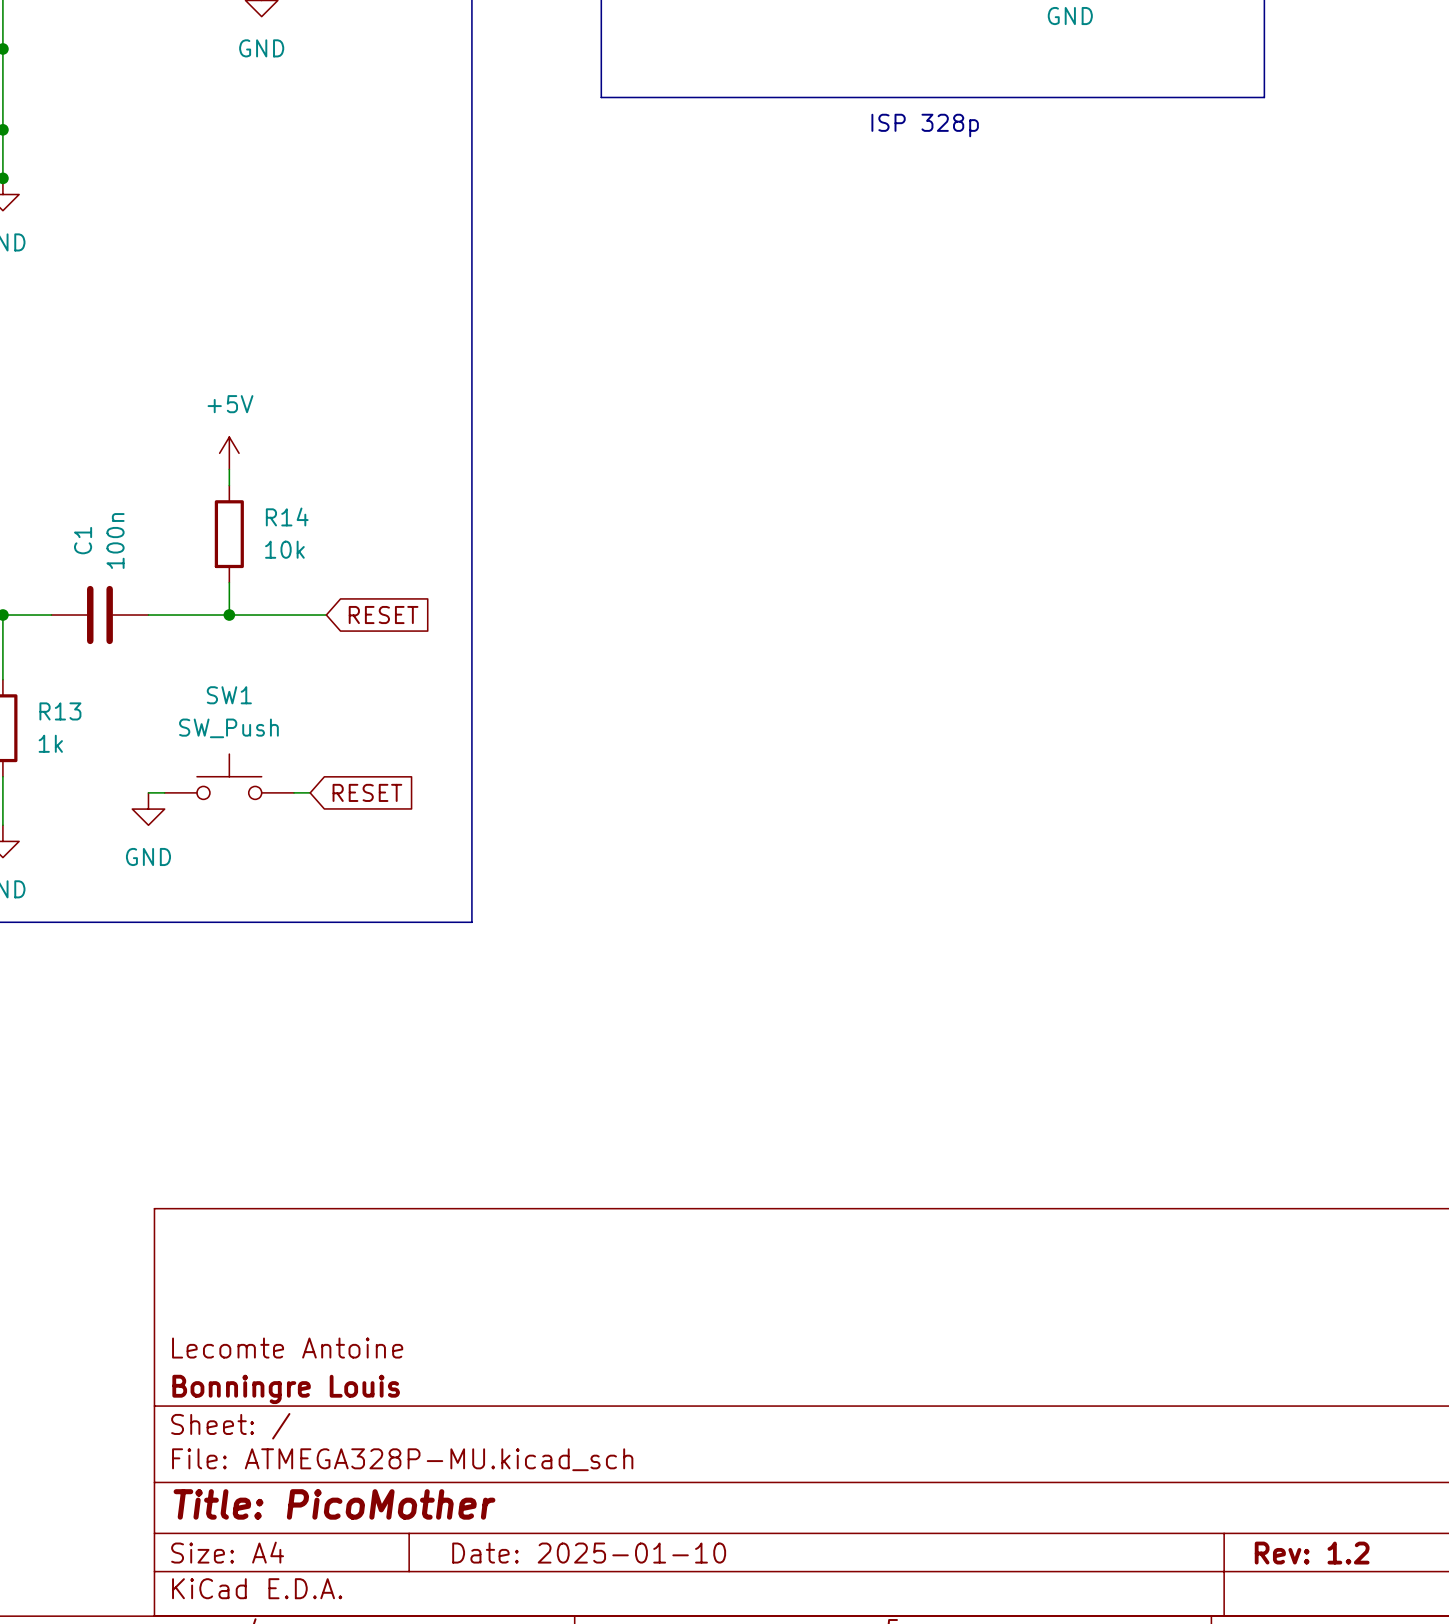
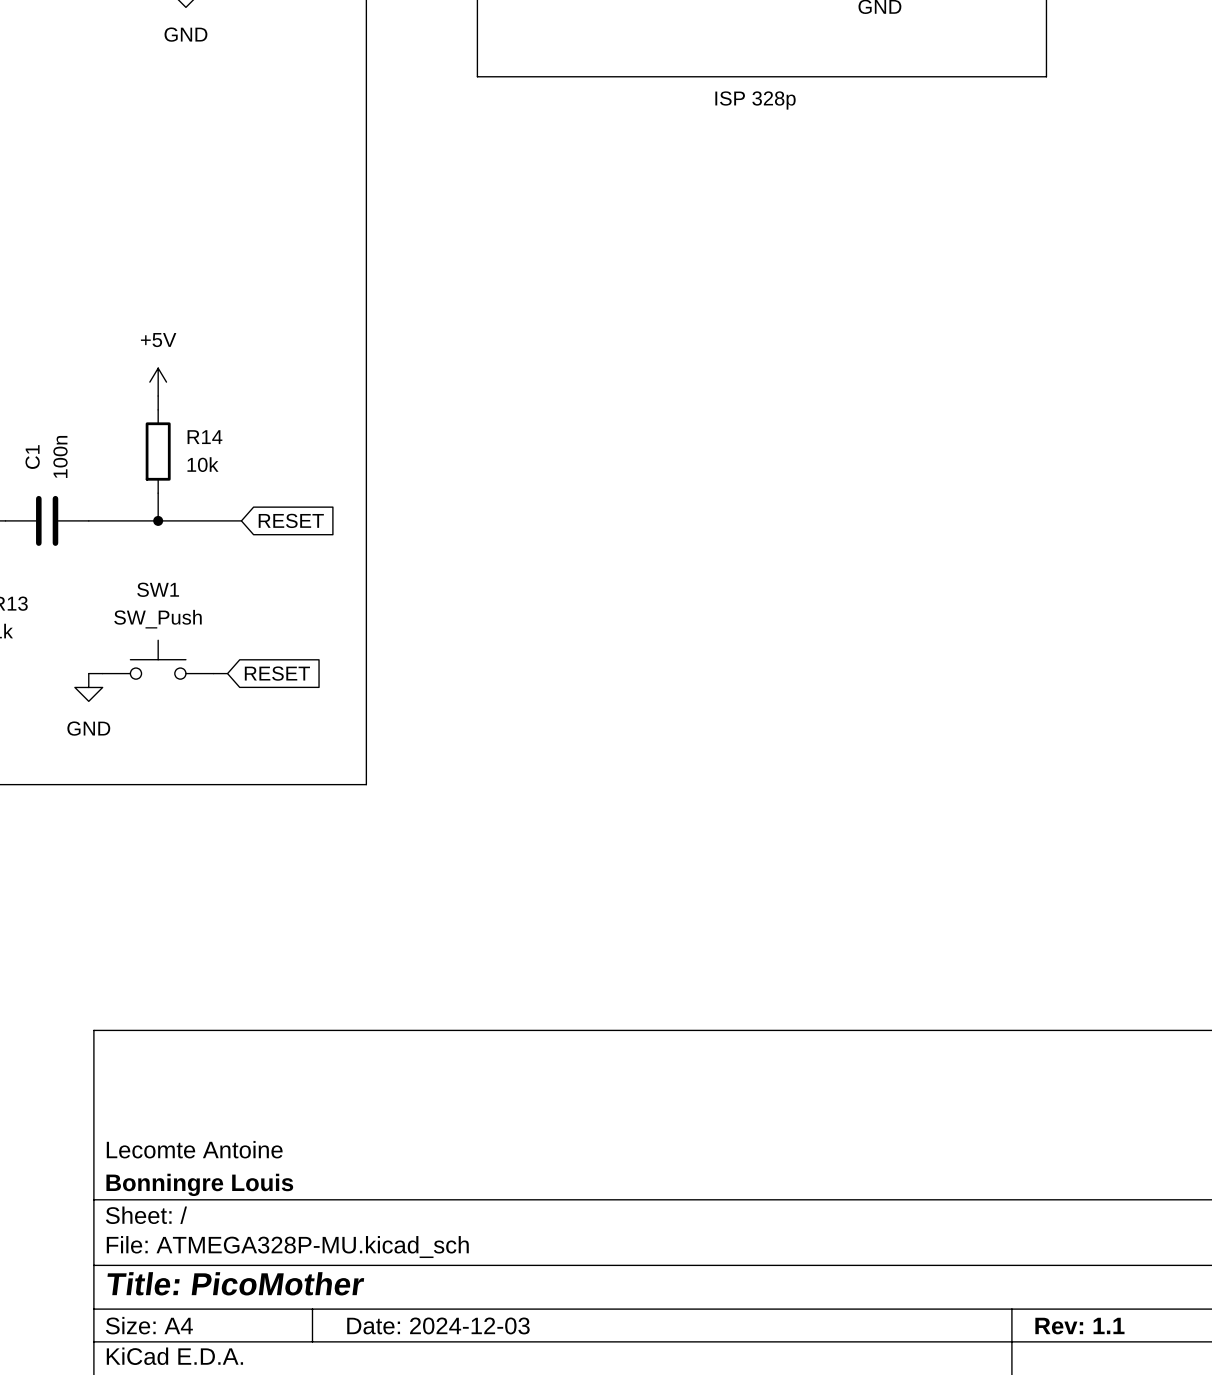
title block: Date: 2025-01-10 (589, 1553) -> Date: 2024-12-03 (438, 1325)
title block: Rev: 1.2 (1312, 1553) -> Rev: 1.1 (1079, 1326)

